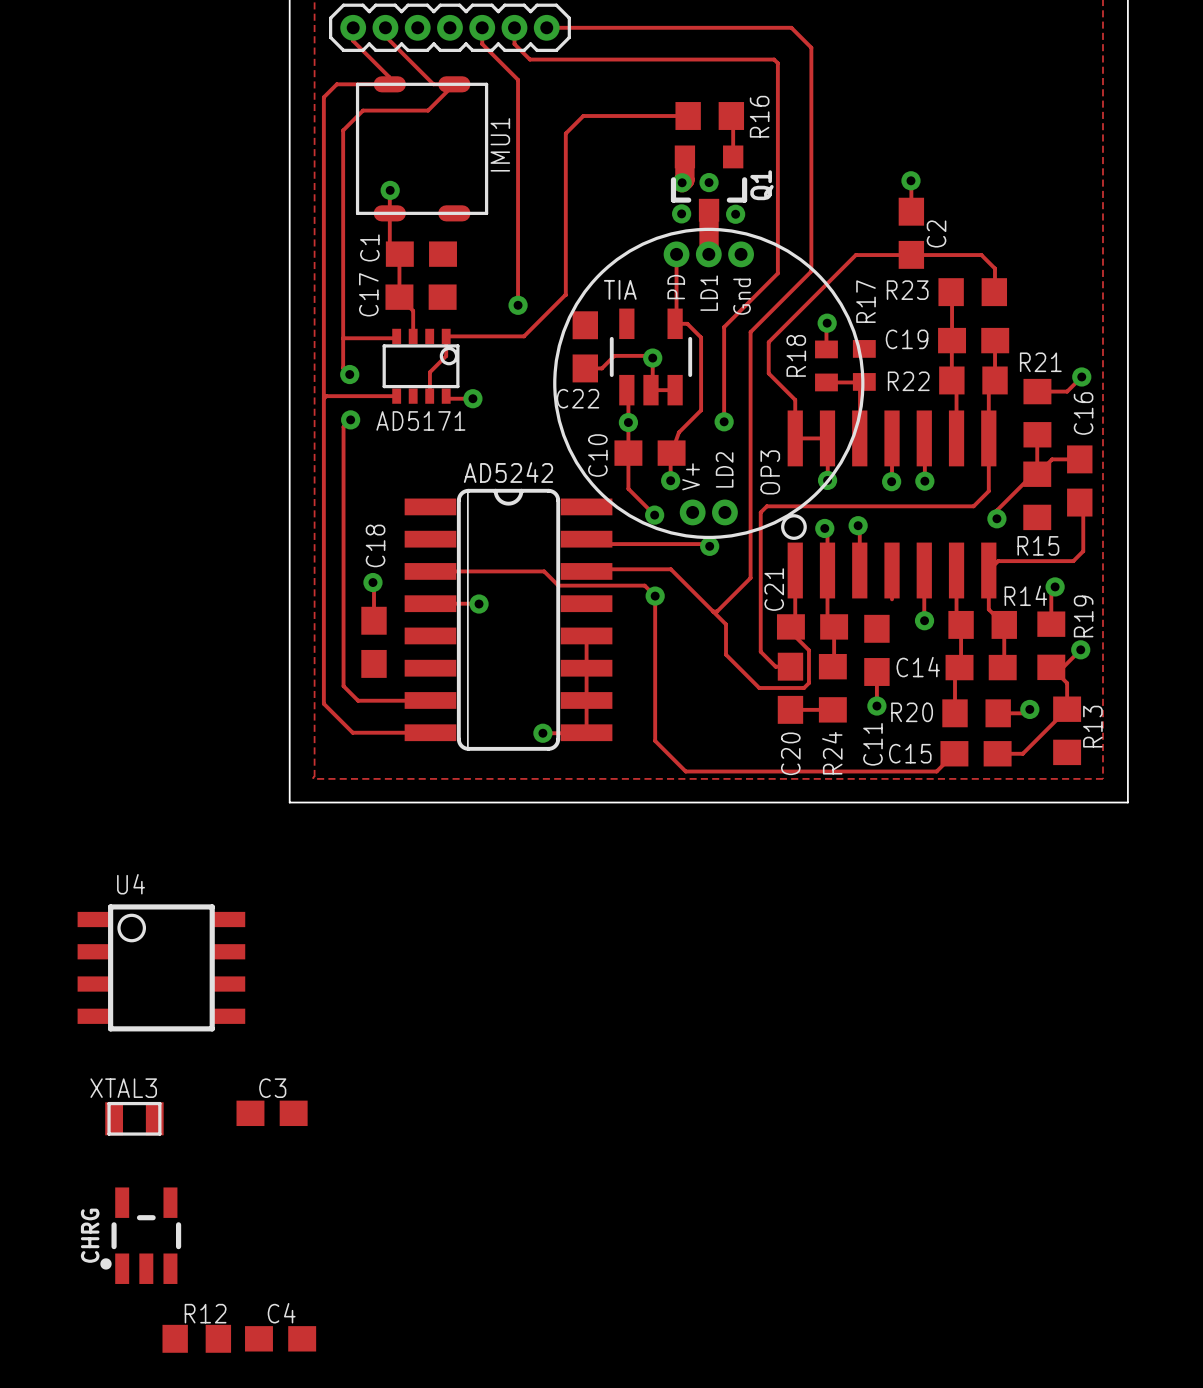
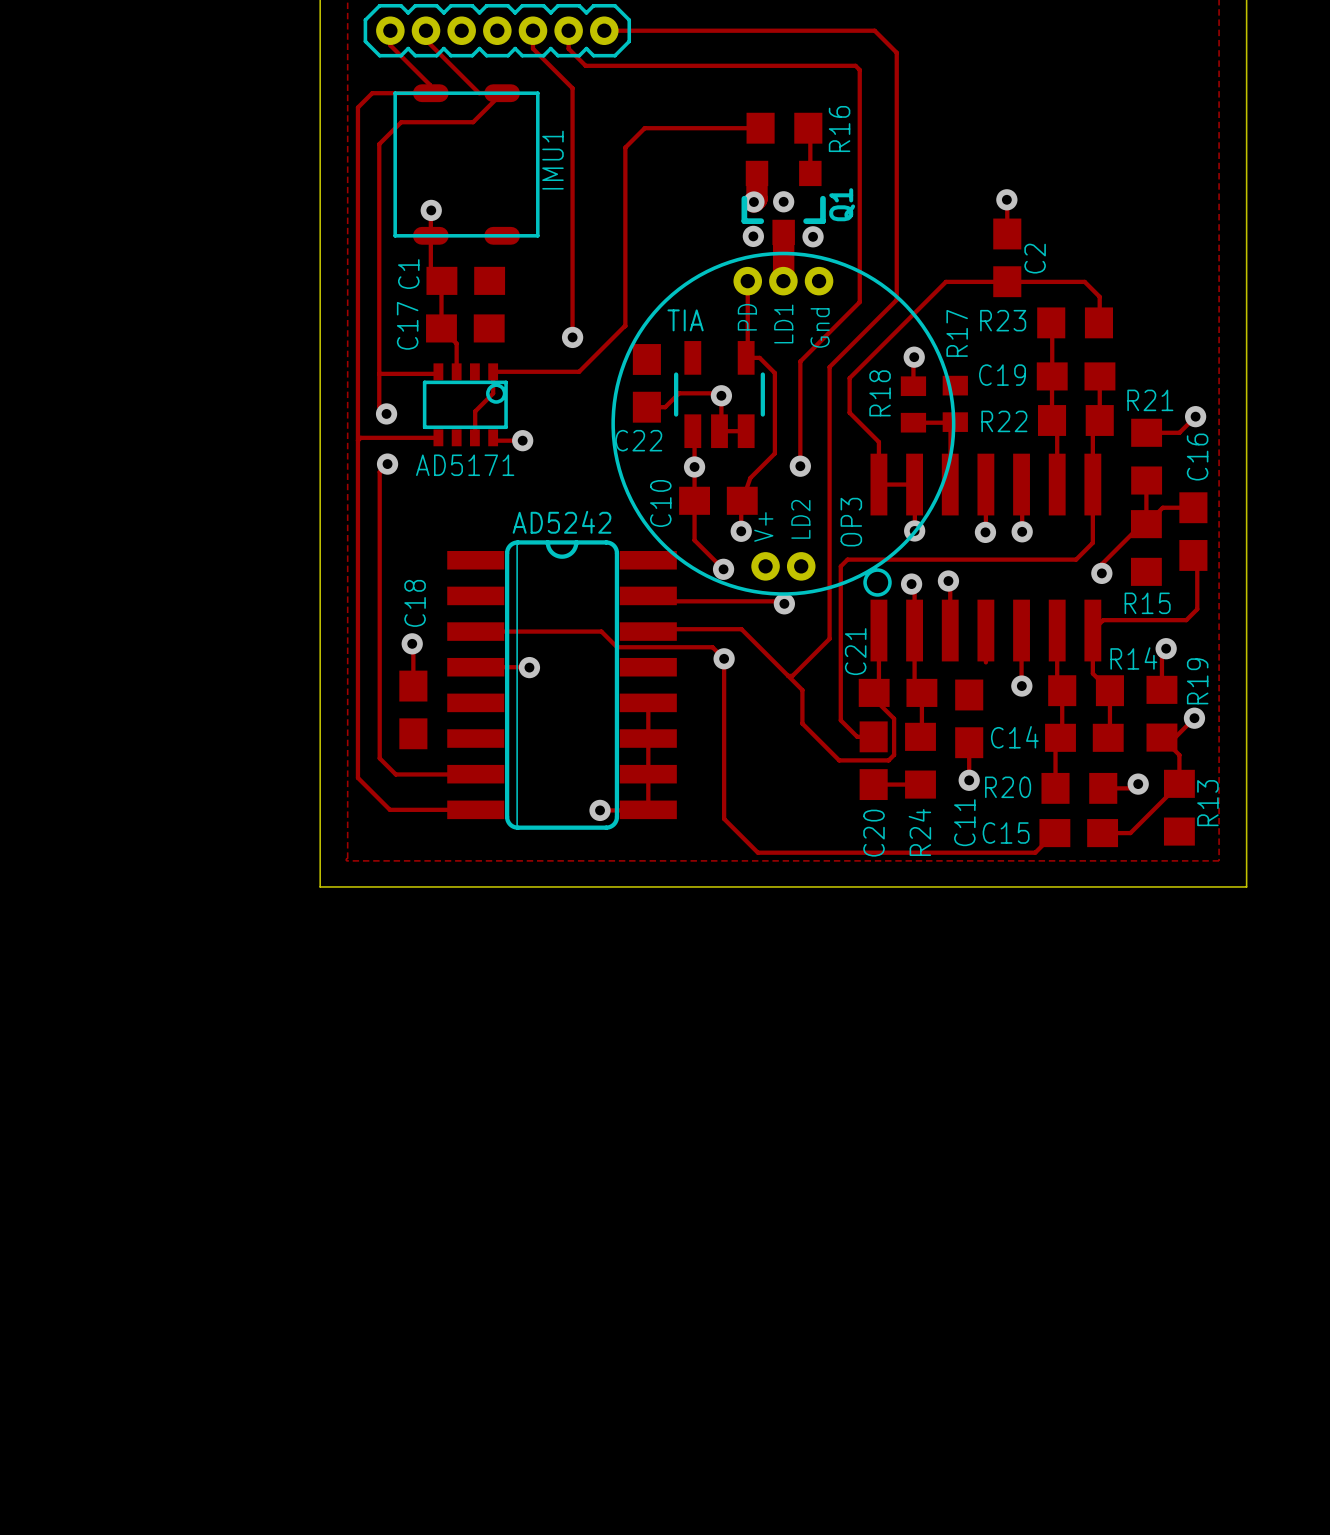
U4: (161, 967) -> none
C3: (272, 1113) -> none
XTAL3: (134, 1118) -> none
CHRG: (140, 1235) -> none
R12: (196, 1338) -> none
C4: (280, 1338) -> none

